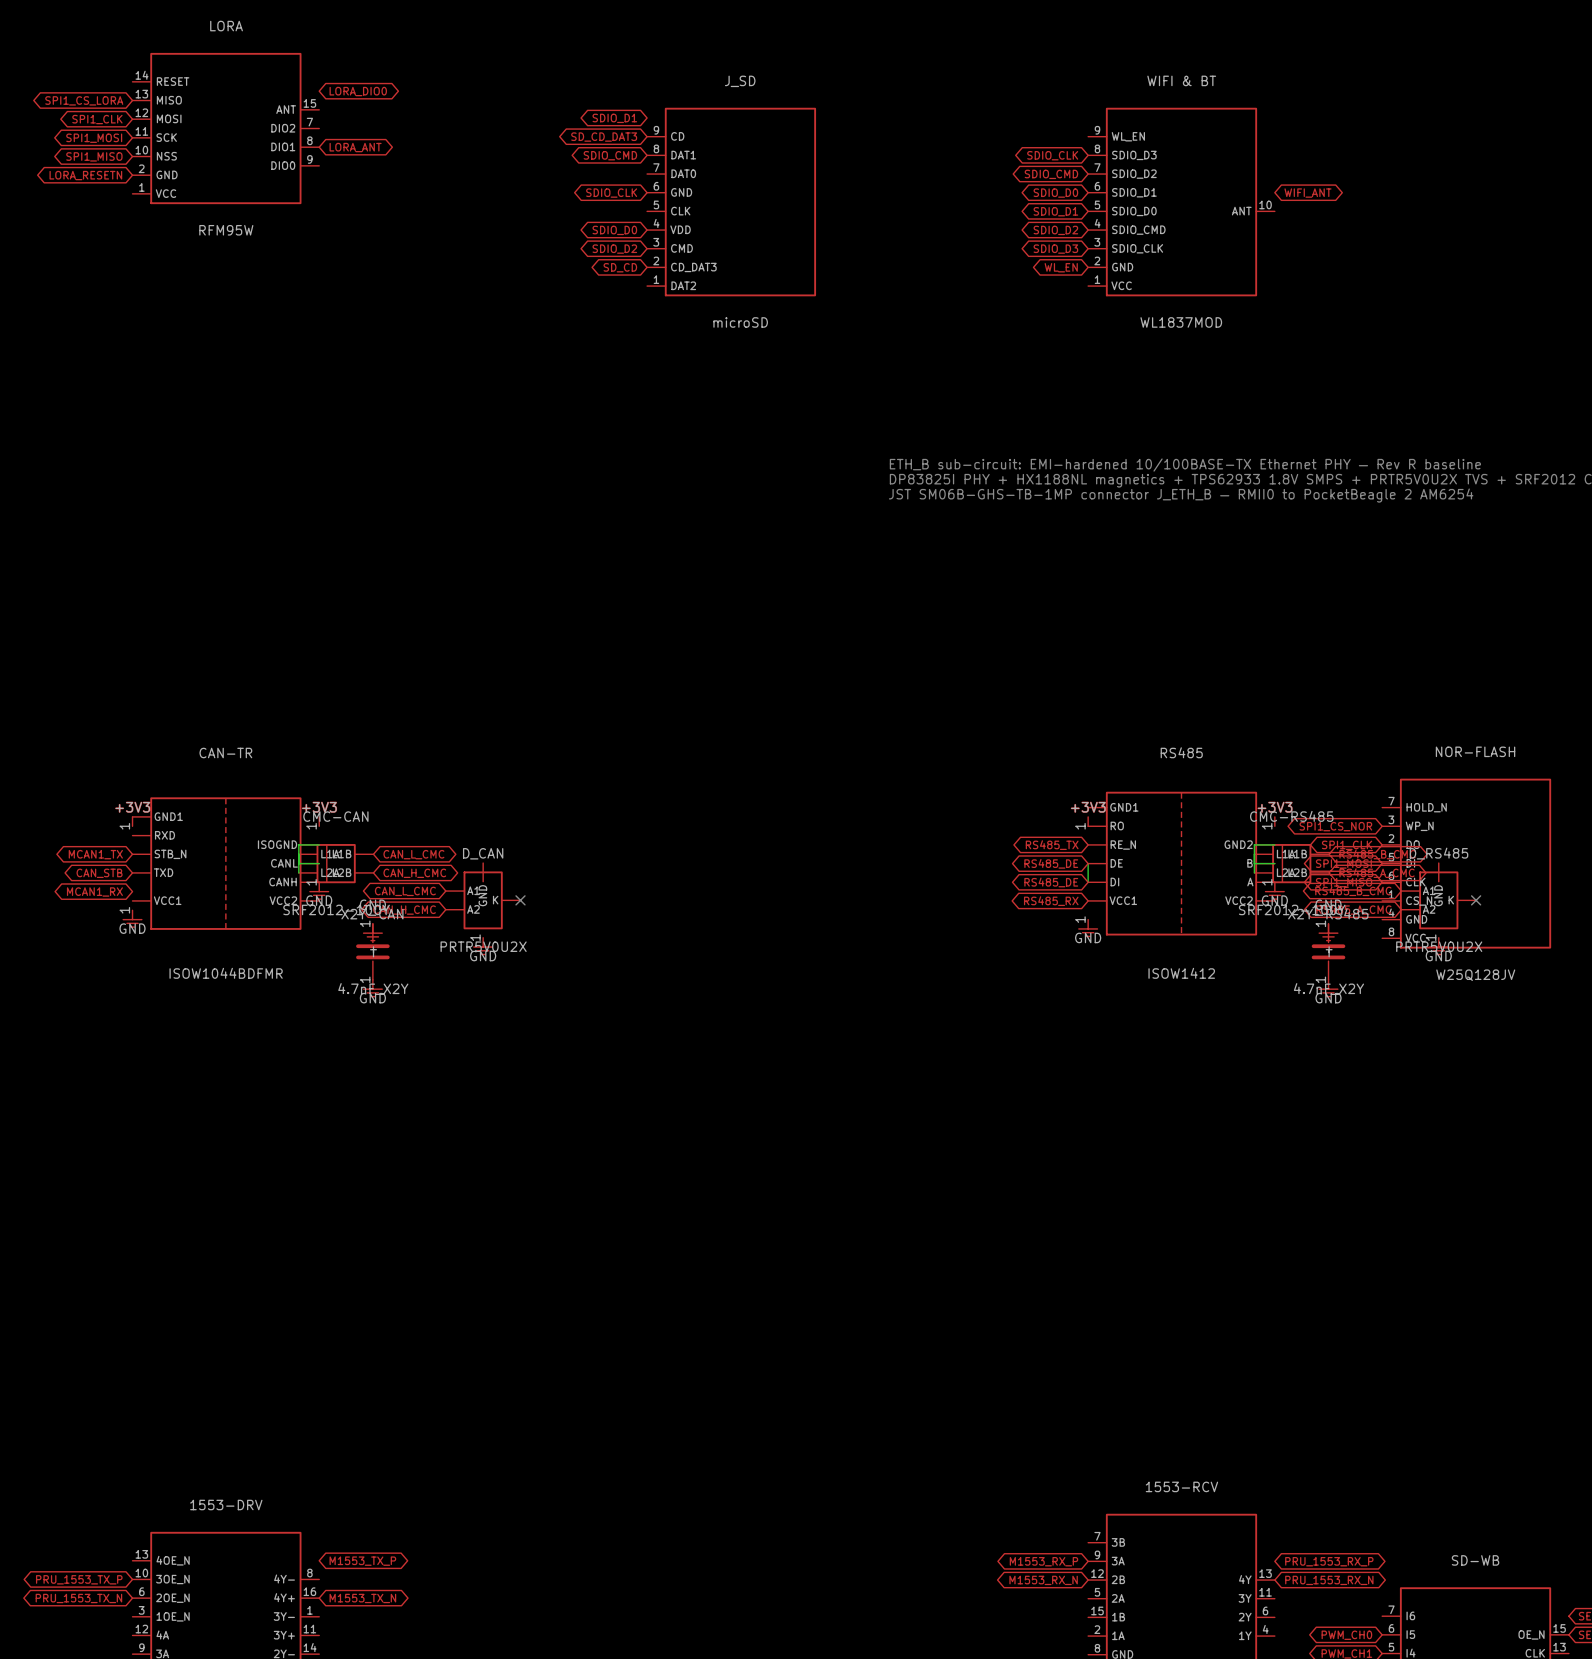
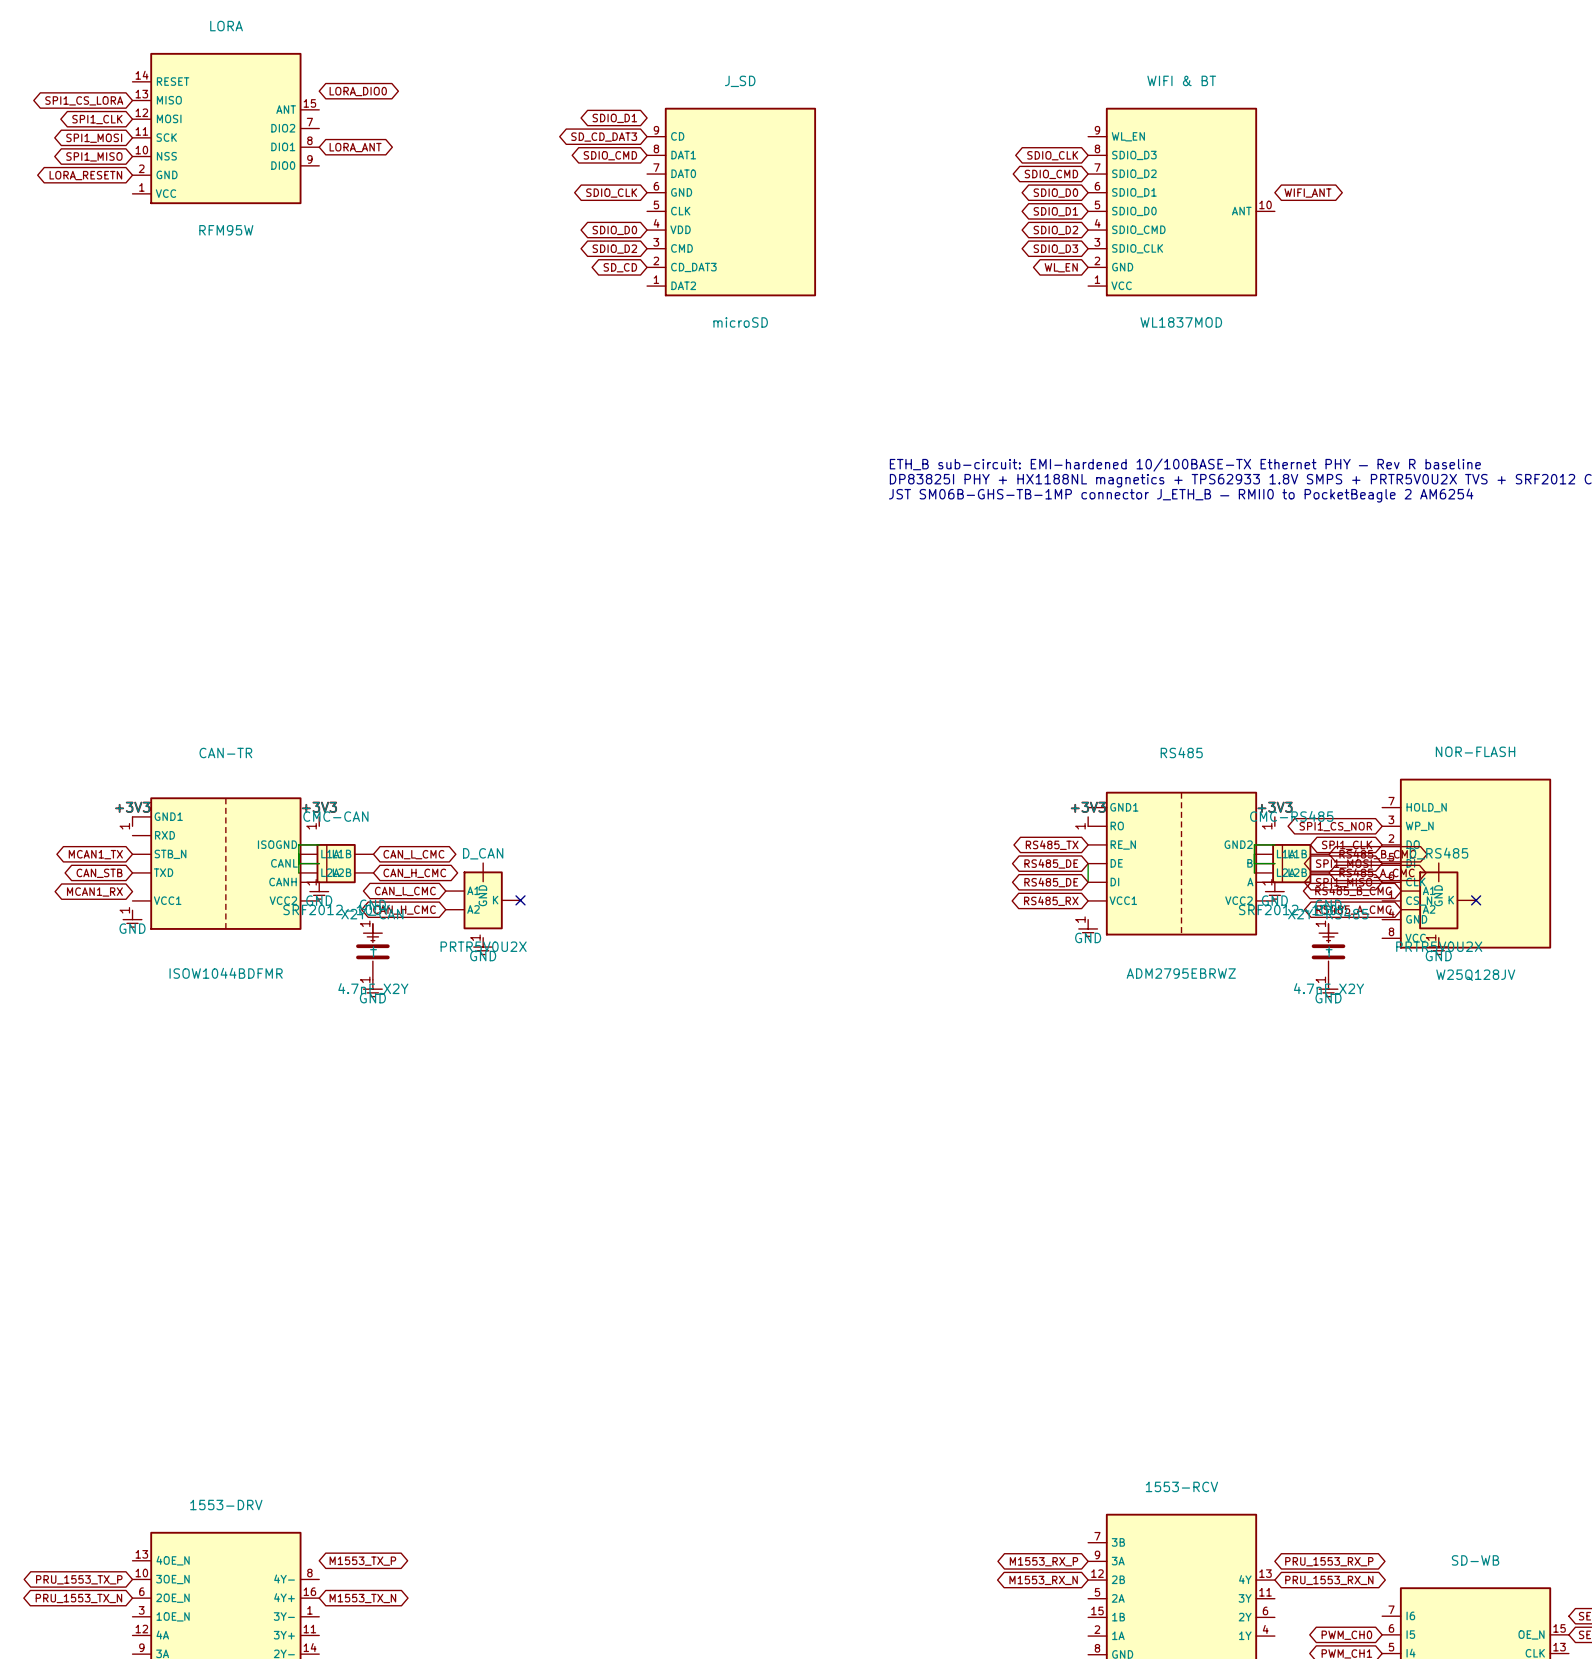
RS485 value: ISOW1412 (1181, 973) -> ADM2795EBRWZ (1181, 973)

